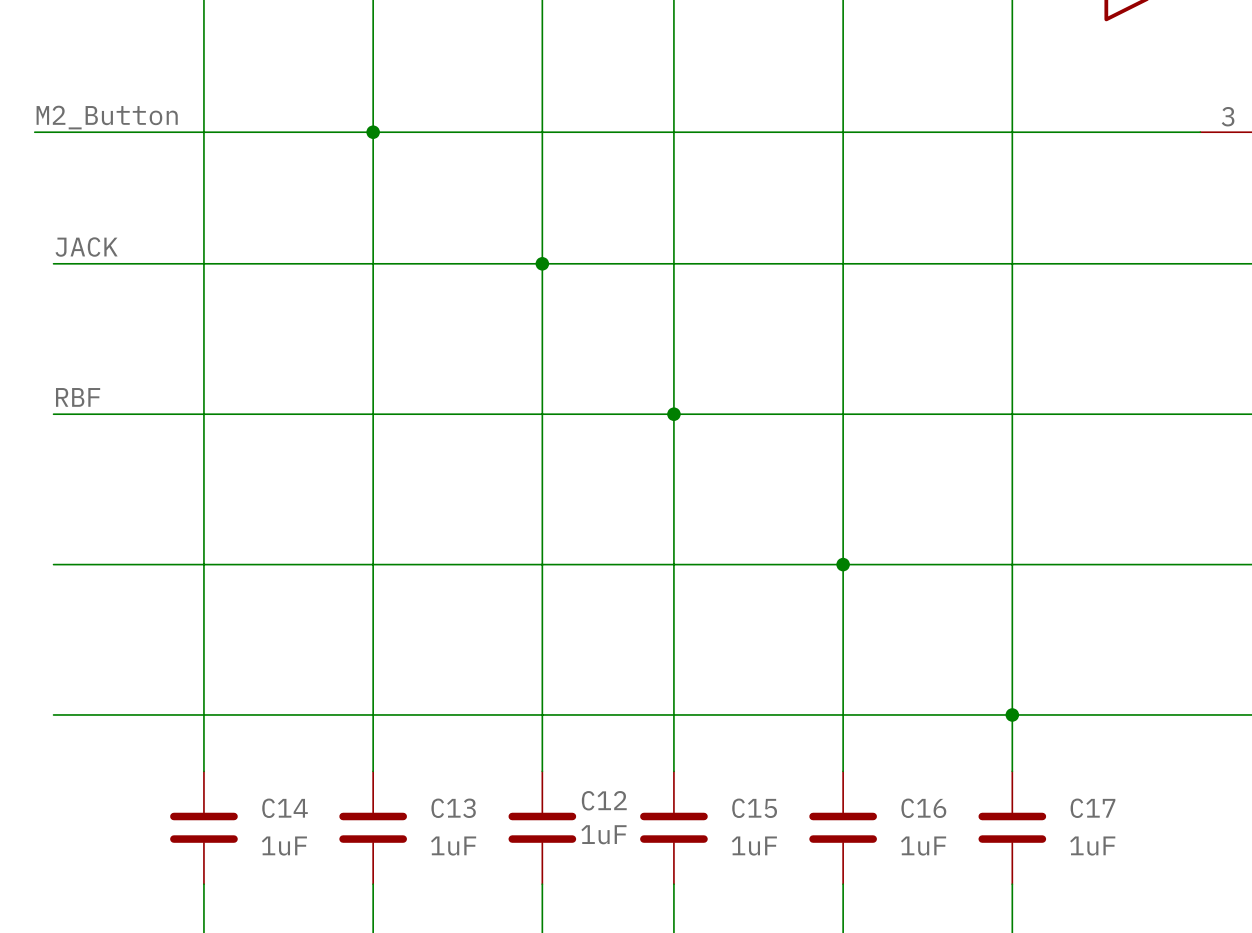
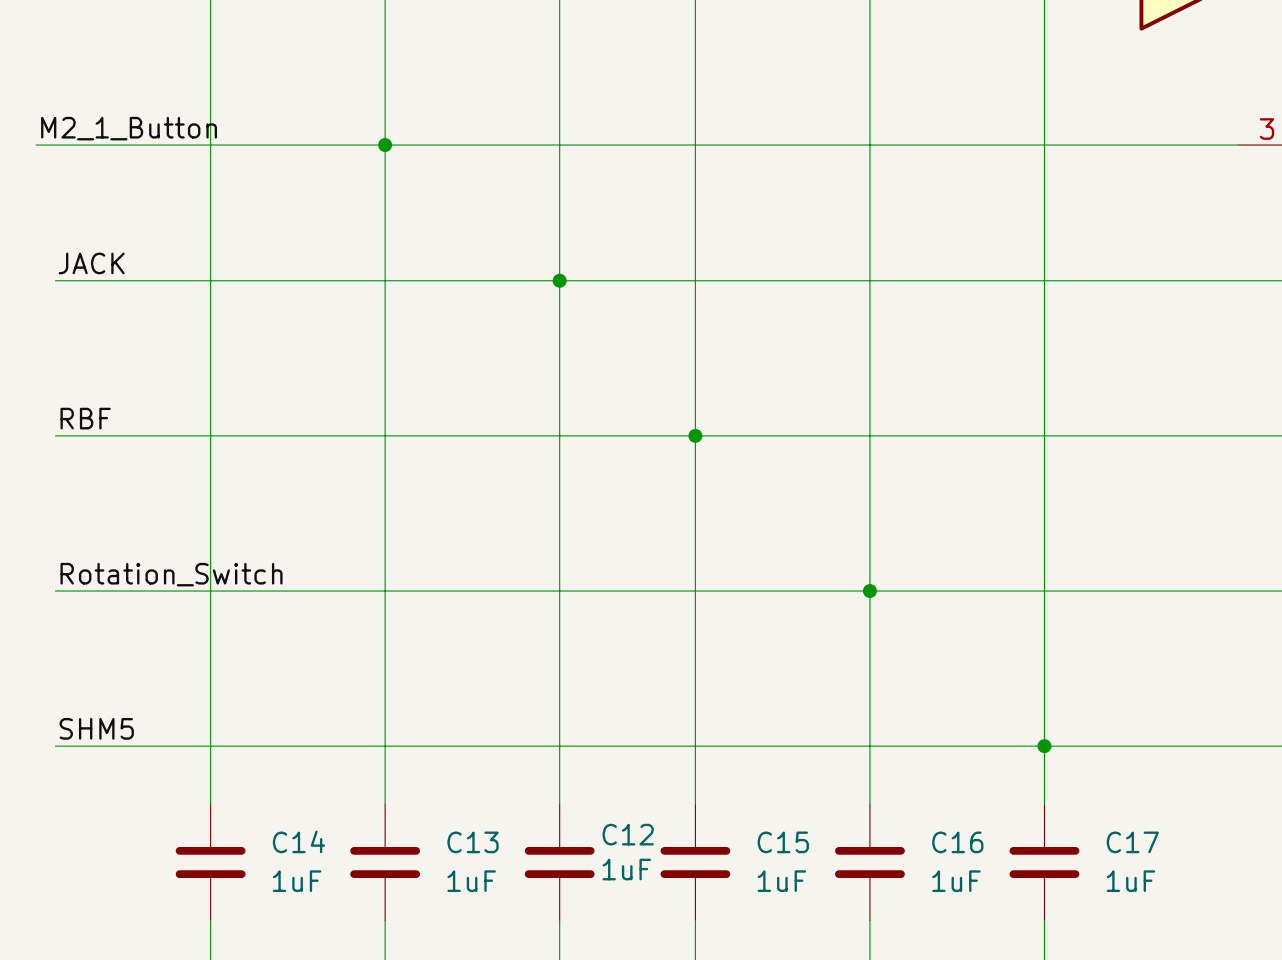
label: M2_Button (107, 117) -> M2_1_Button (129, 128)
label: none -> Rotation_Switch (171, 574)
label: none -> SHM5 (96, 728)

